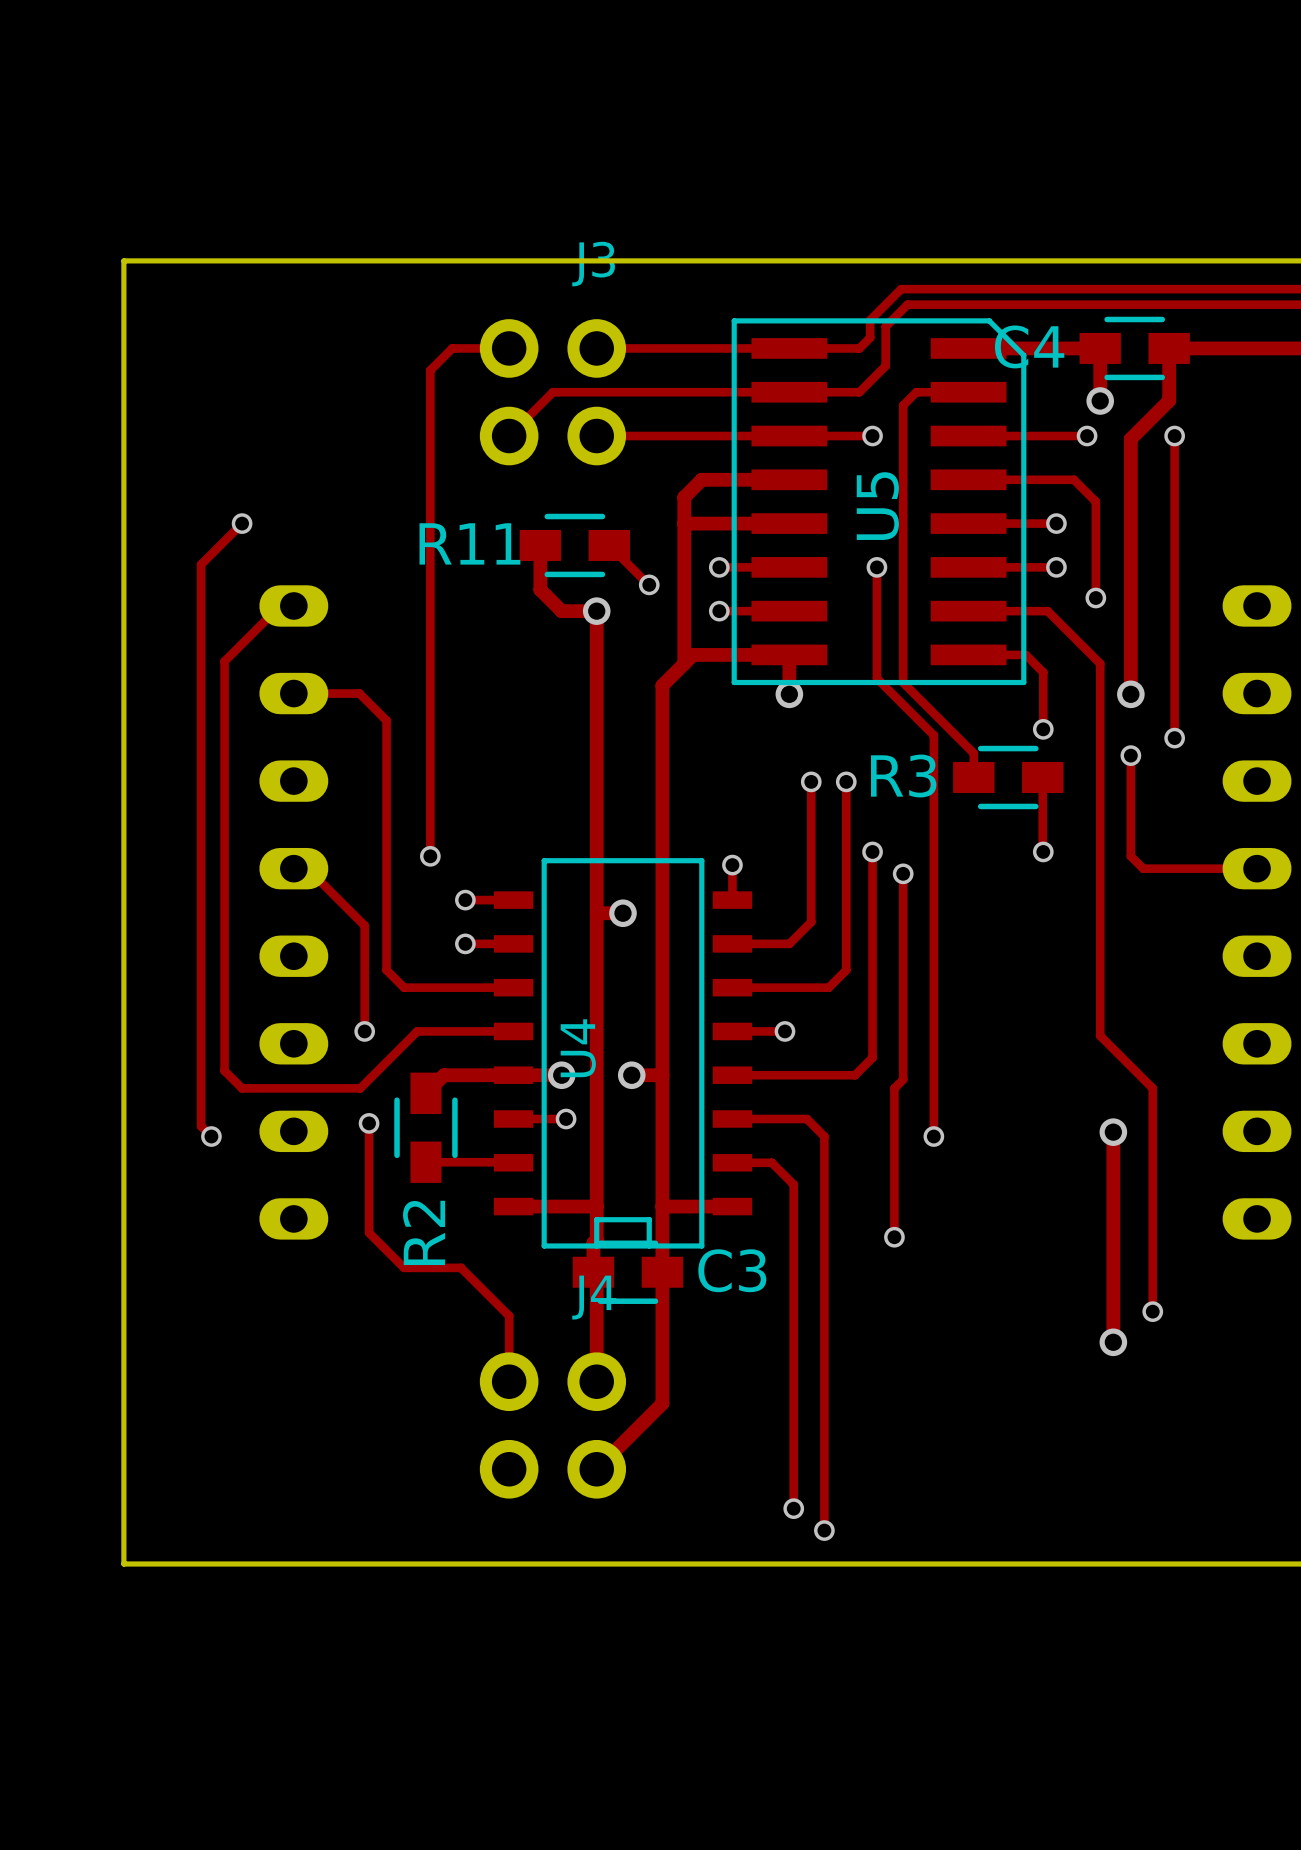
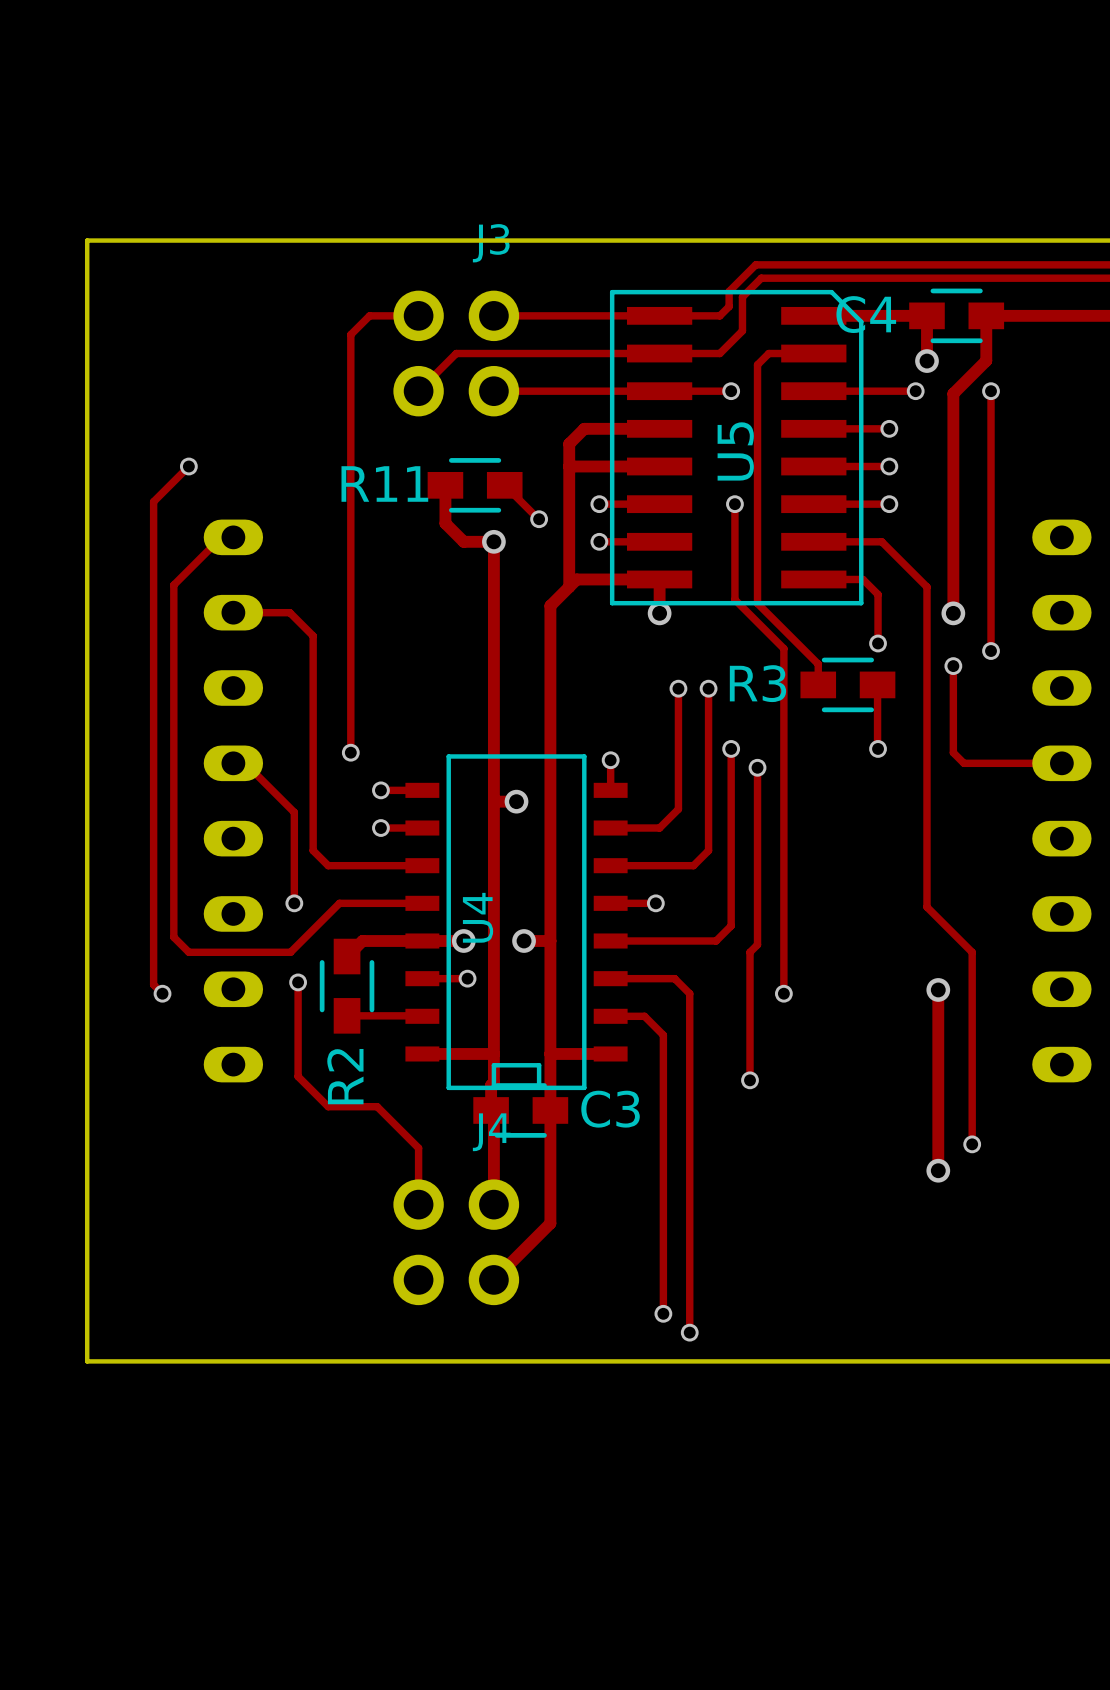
track: (1056, 479) (1073, 479) (1095, 501) (1095, 598) -> none
via position: (1095, 598) -> (889, 428)

